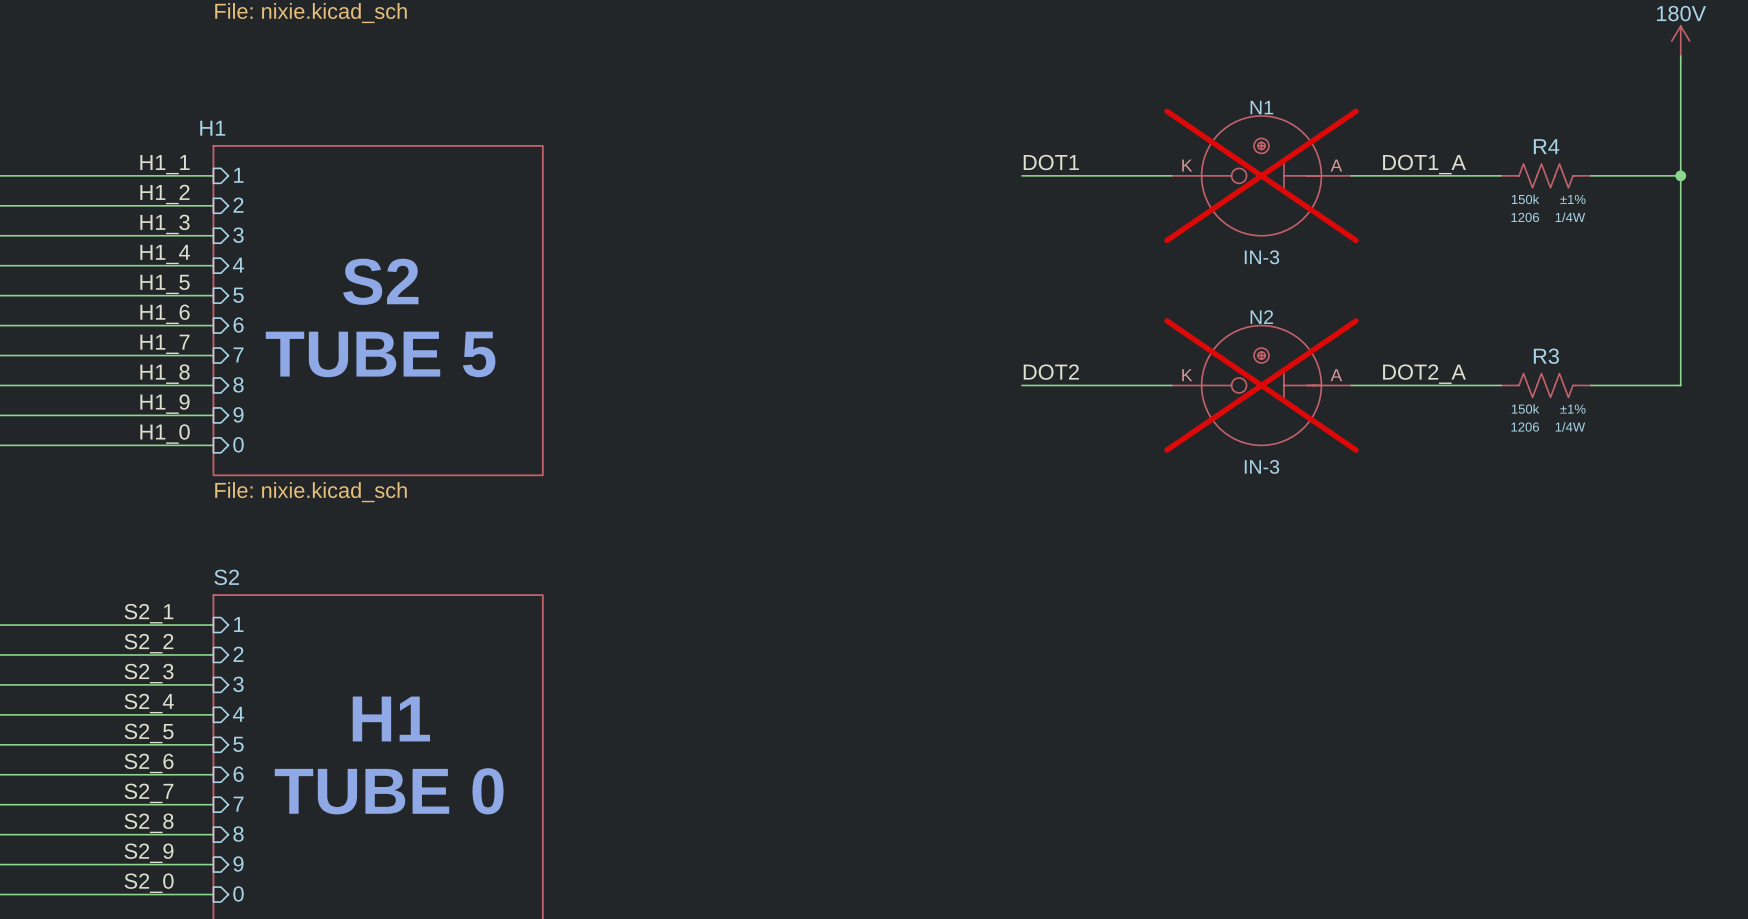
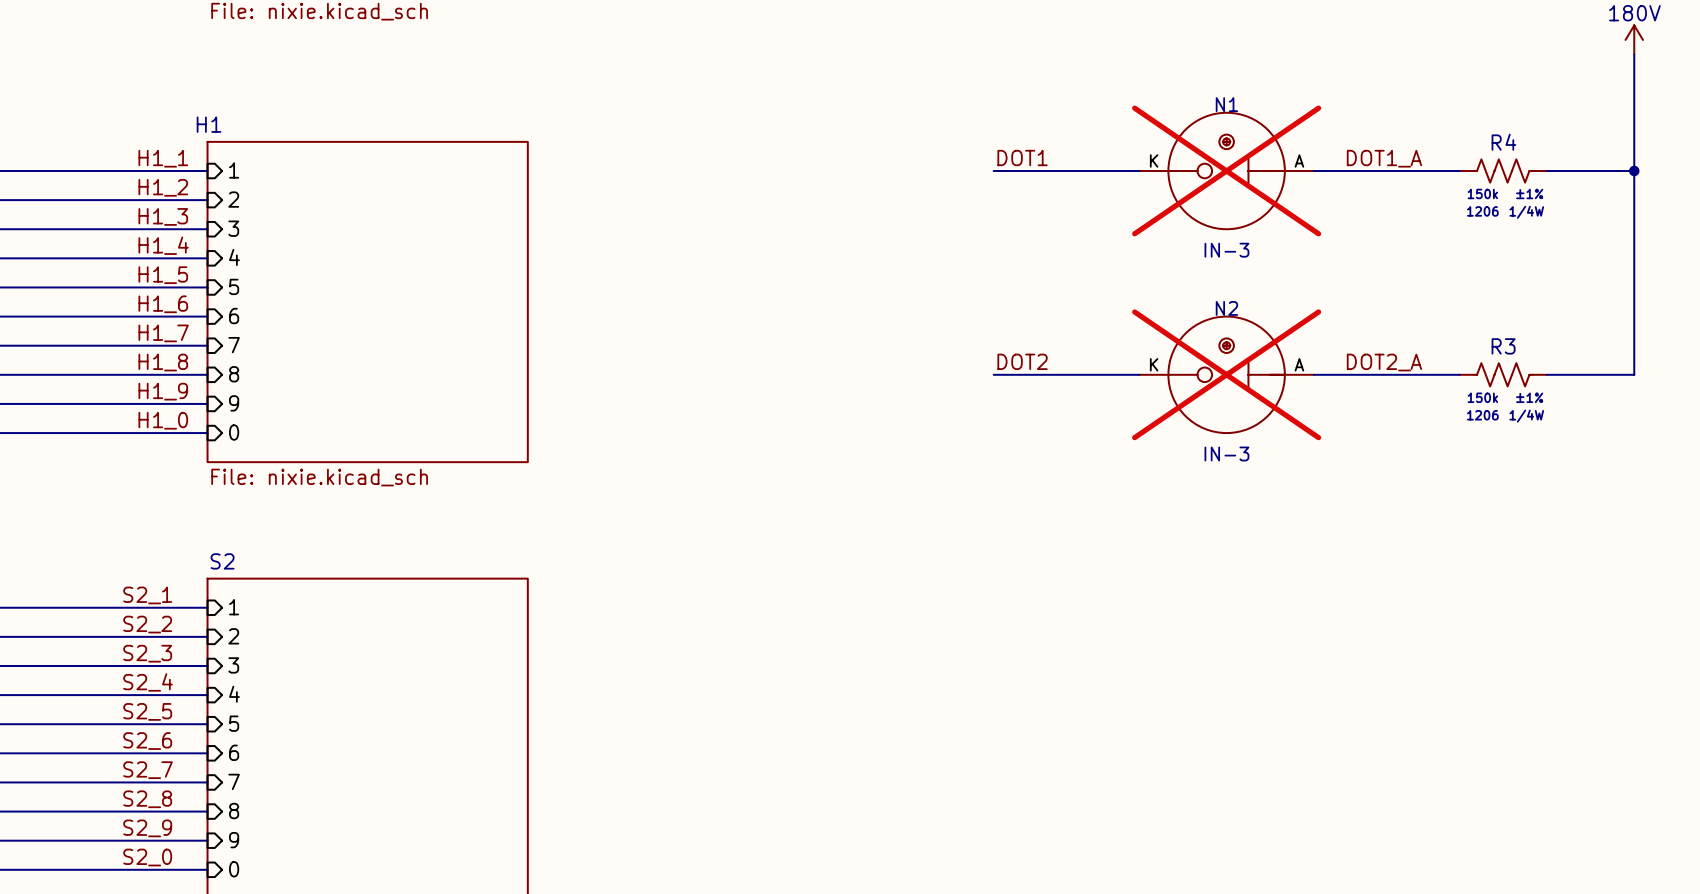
text: S2 (380, 281) -> none
text: TUBE 5 (380, 354) -> none
text: H1 (391, 719) -> none
text: TUBE 0 (389, 791) -> none

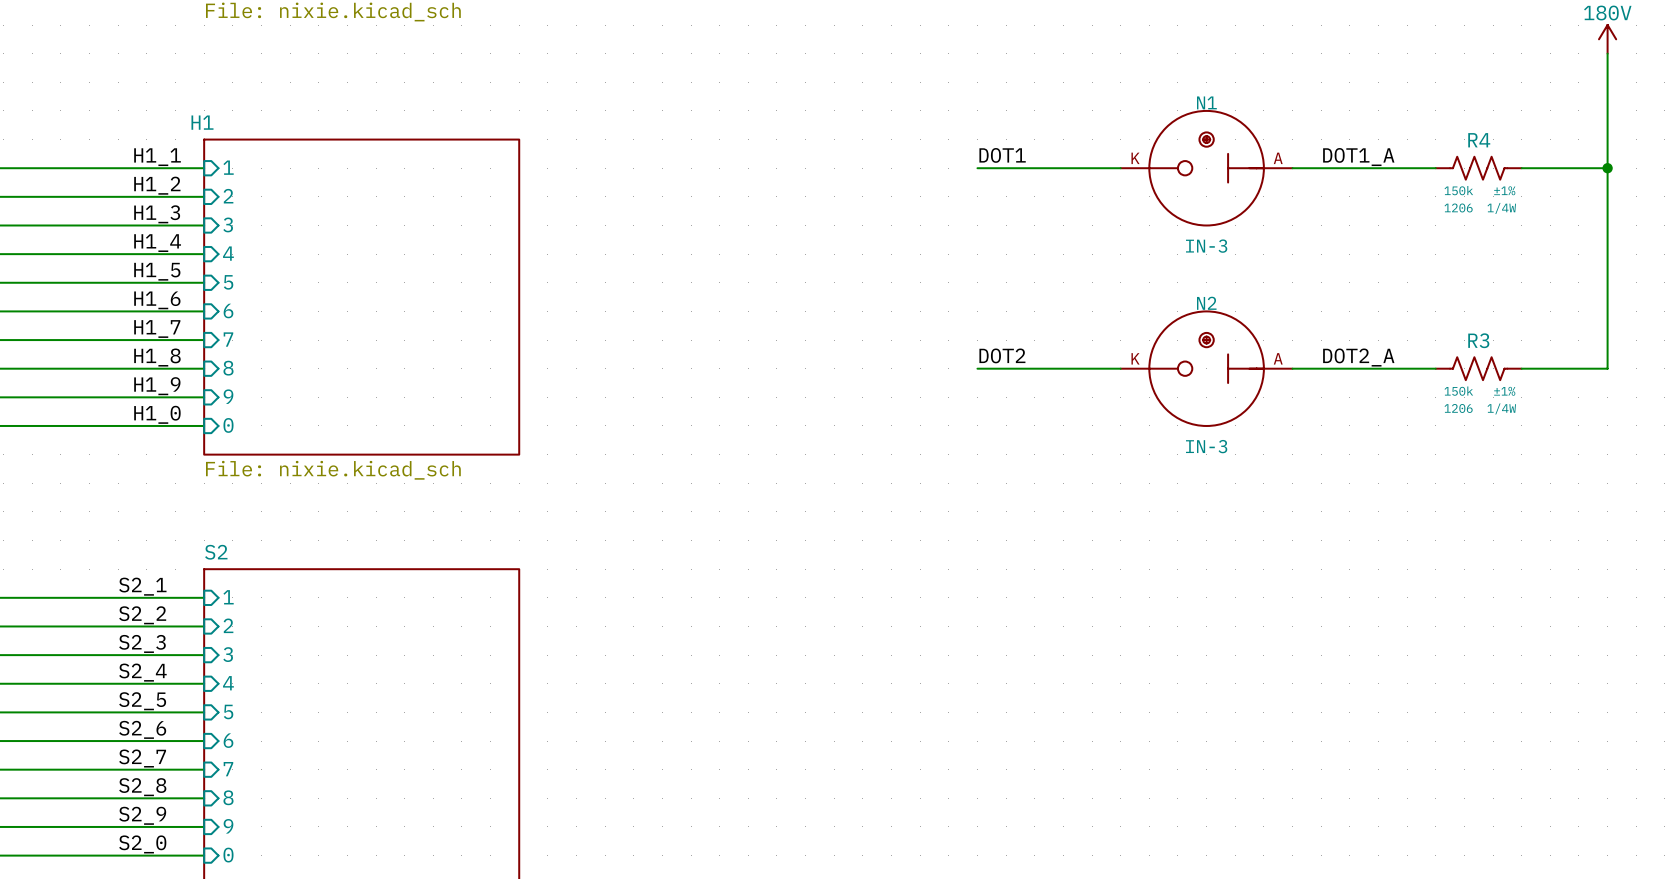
N1 do-not-place cross: (1226, 170) -> none
N2 do-not-place cross: (1226, 374) -> none

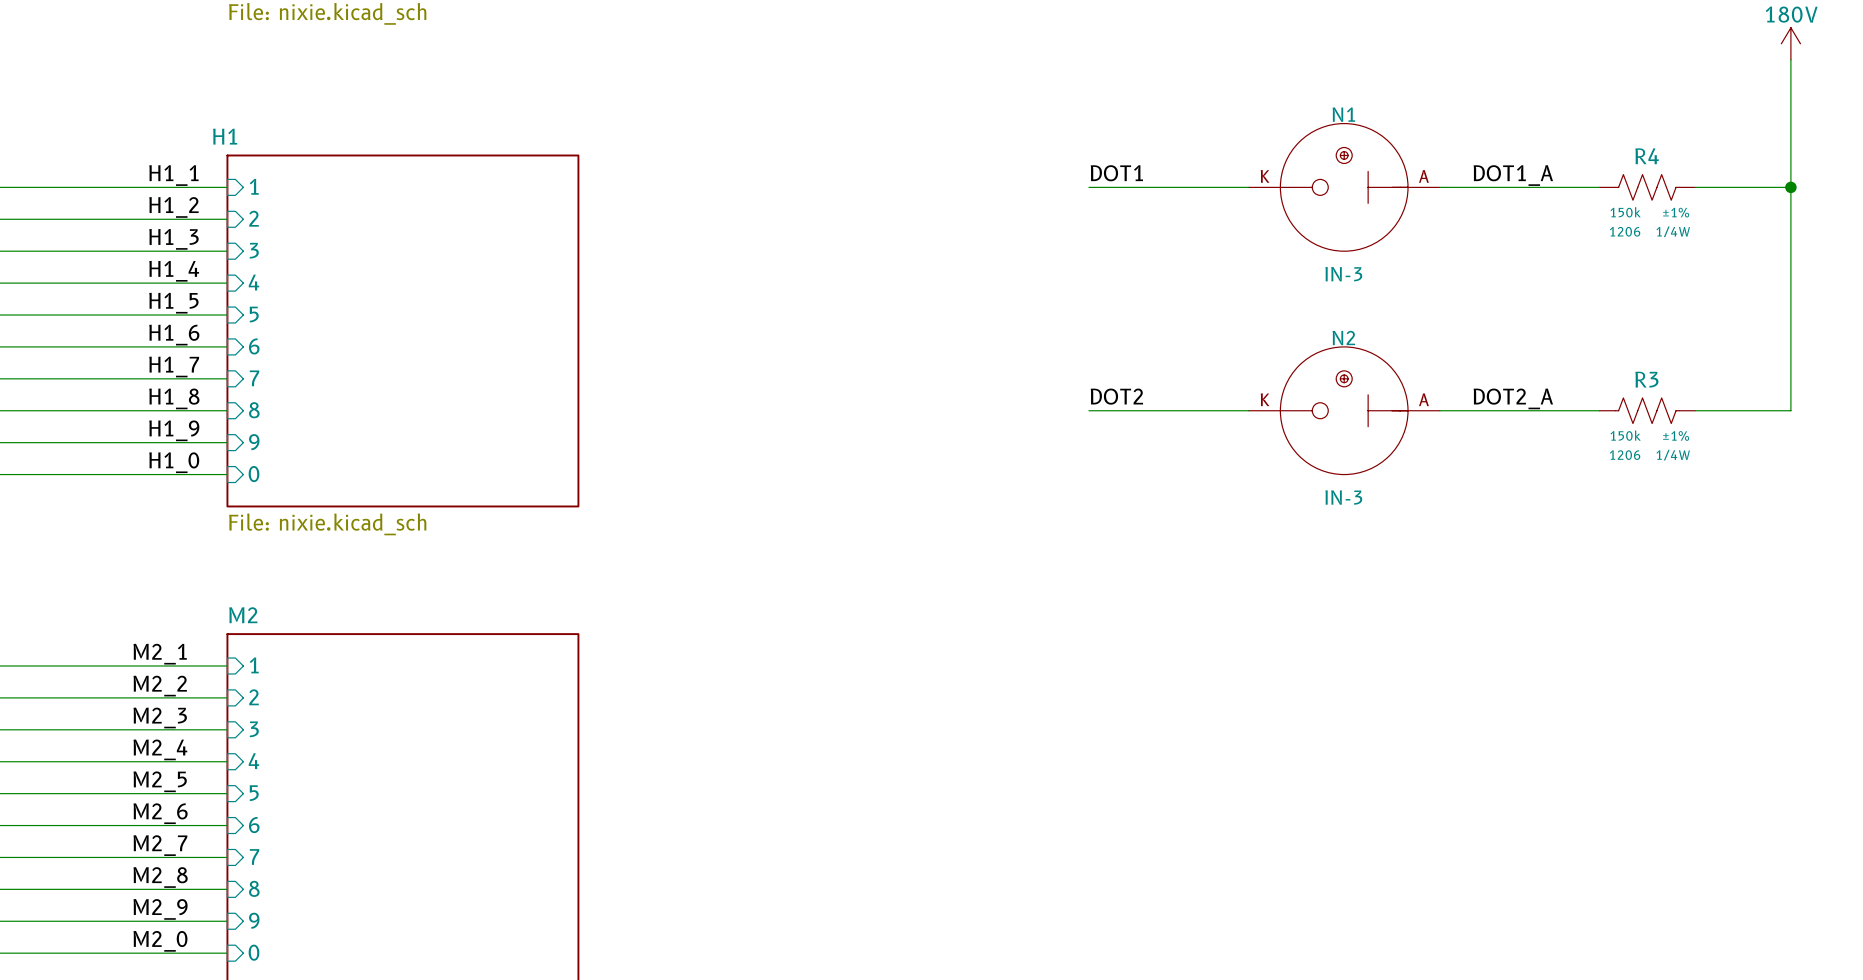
sheet S2 name: S2 (216, 552) -> M2 (243, 615)
label: S2_1 (142, 586) -> M2_1 (160, 654)
label: S2_2 (142, 615) -> M2_2 (160, 686)
label: S2_3 (142, 643) -> M2_3 (160, 717)
label: S2_4 (142, 672) -> M2_4 (160, 749)
label: S2_5 (142, 701) -> M2_5 (160, 781)
label: S2_6 (142, 729) -> M2_6 (160, 813)
label: S2_7 (142, 758) -> M2_7 (160, 845)
label: S2_8 (142, 787) -> M2_8 (160, 877)
label: S2_9 (142, 815) -> M2_9 (160, 909)
label: S2_0 (142, 844) -> M2_0 (160, 941)

